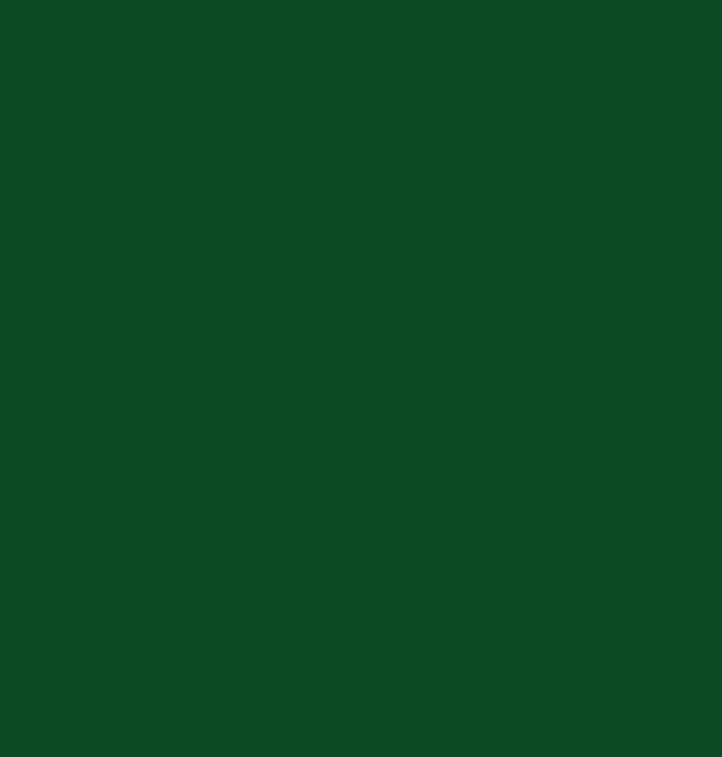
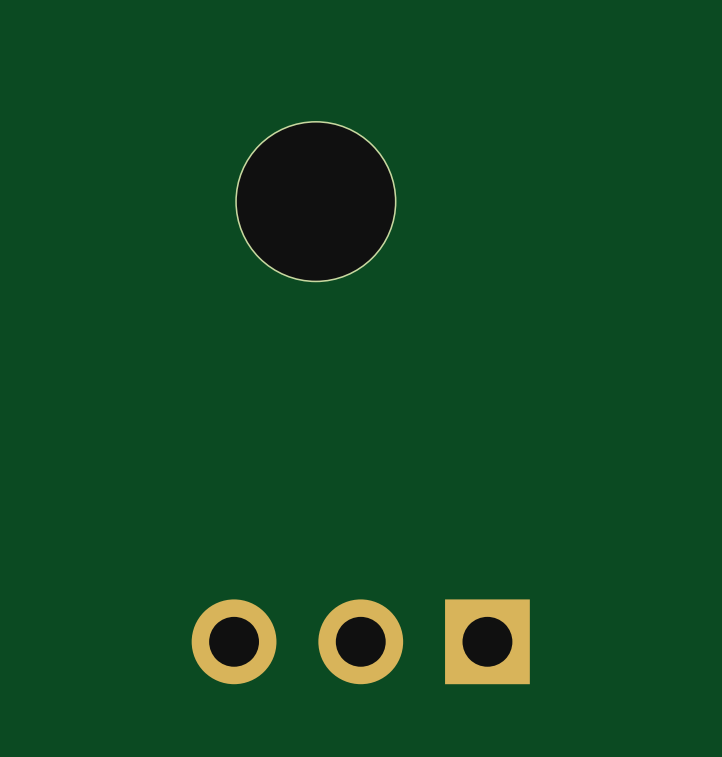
part: none -> (315, 201)
part: none -> (360, 641)

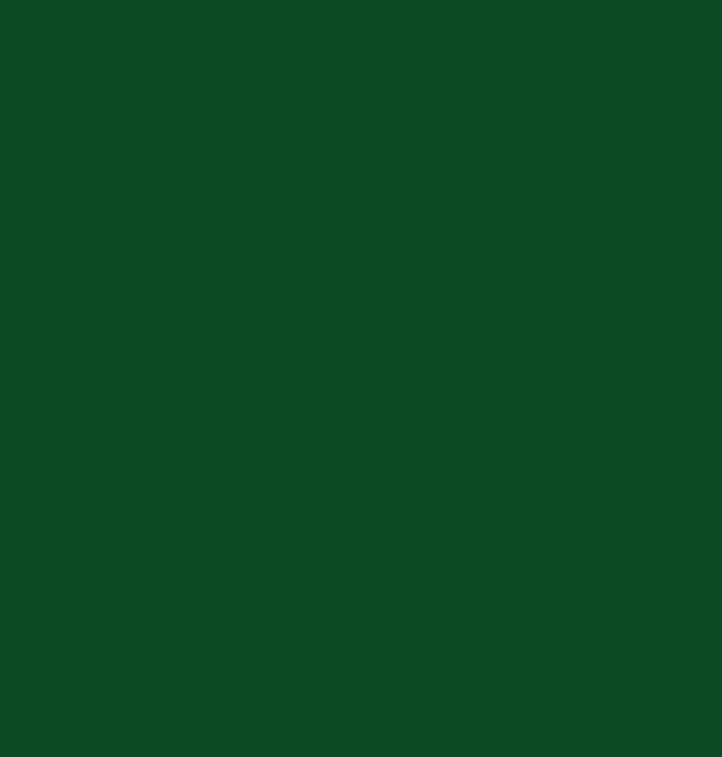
part: (315, 201) -> none
part: (360, 641) -> none

